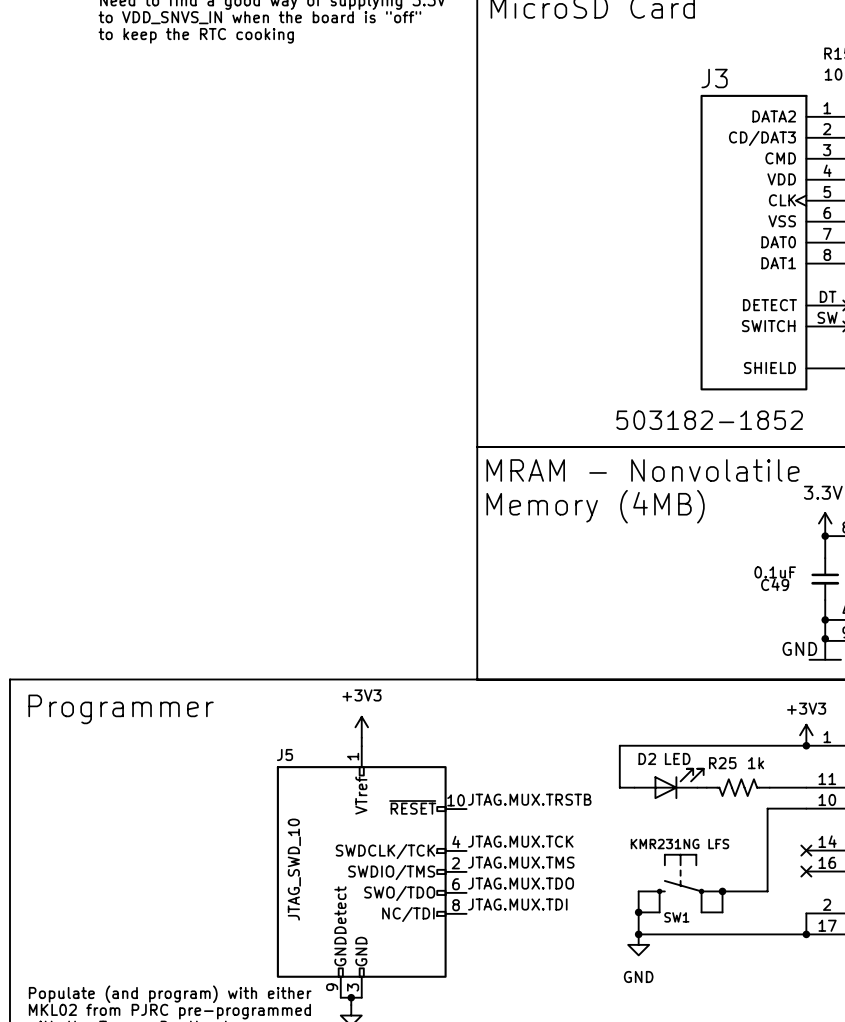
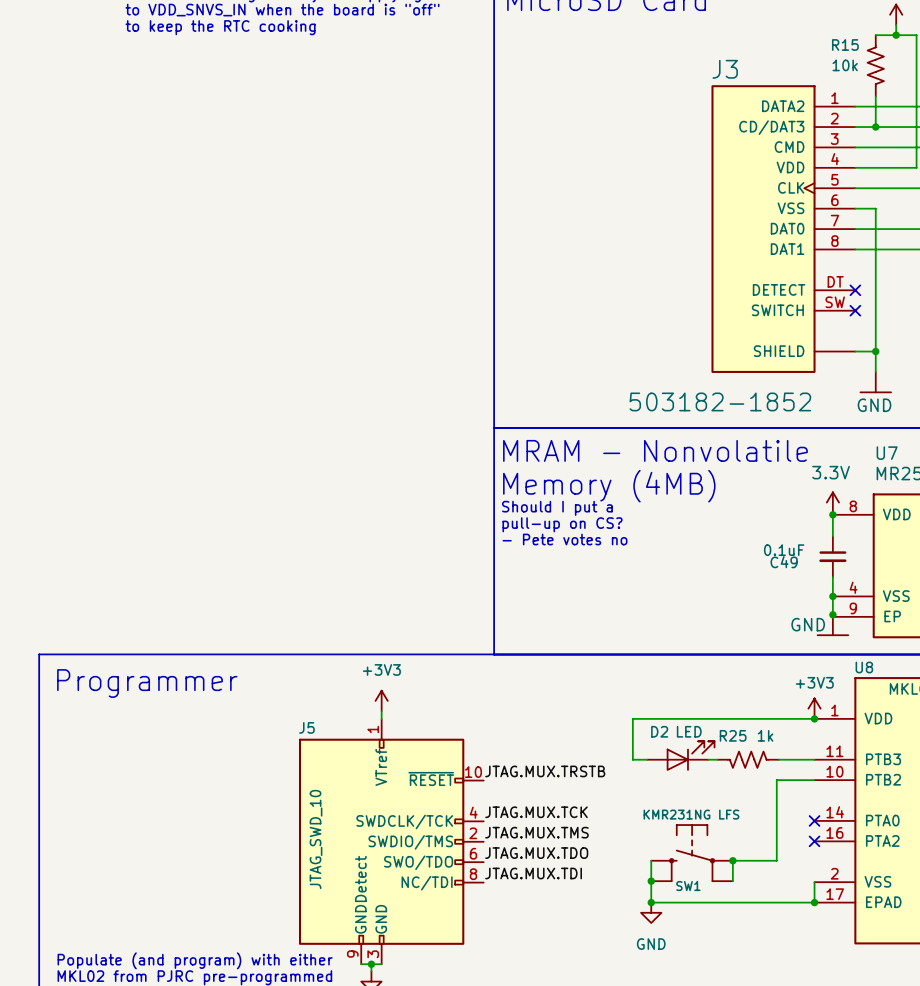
text: none -> Should I put a (557, 508)
text: none -> pull-up on CS? (562, 524)
text: none -> - Pete votes no (564, 539)

